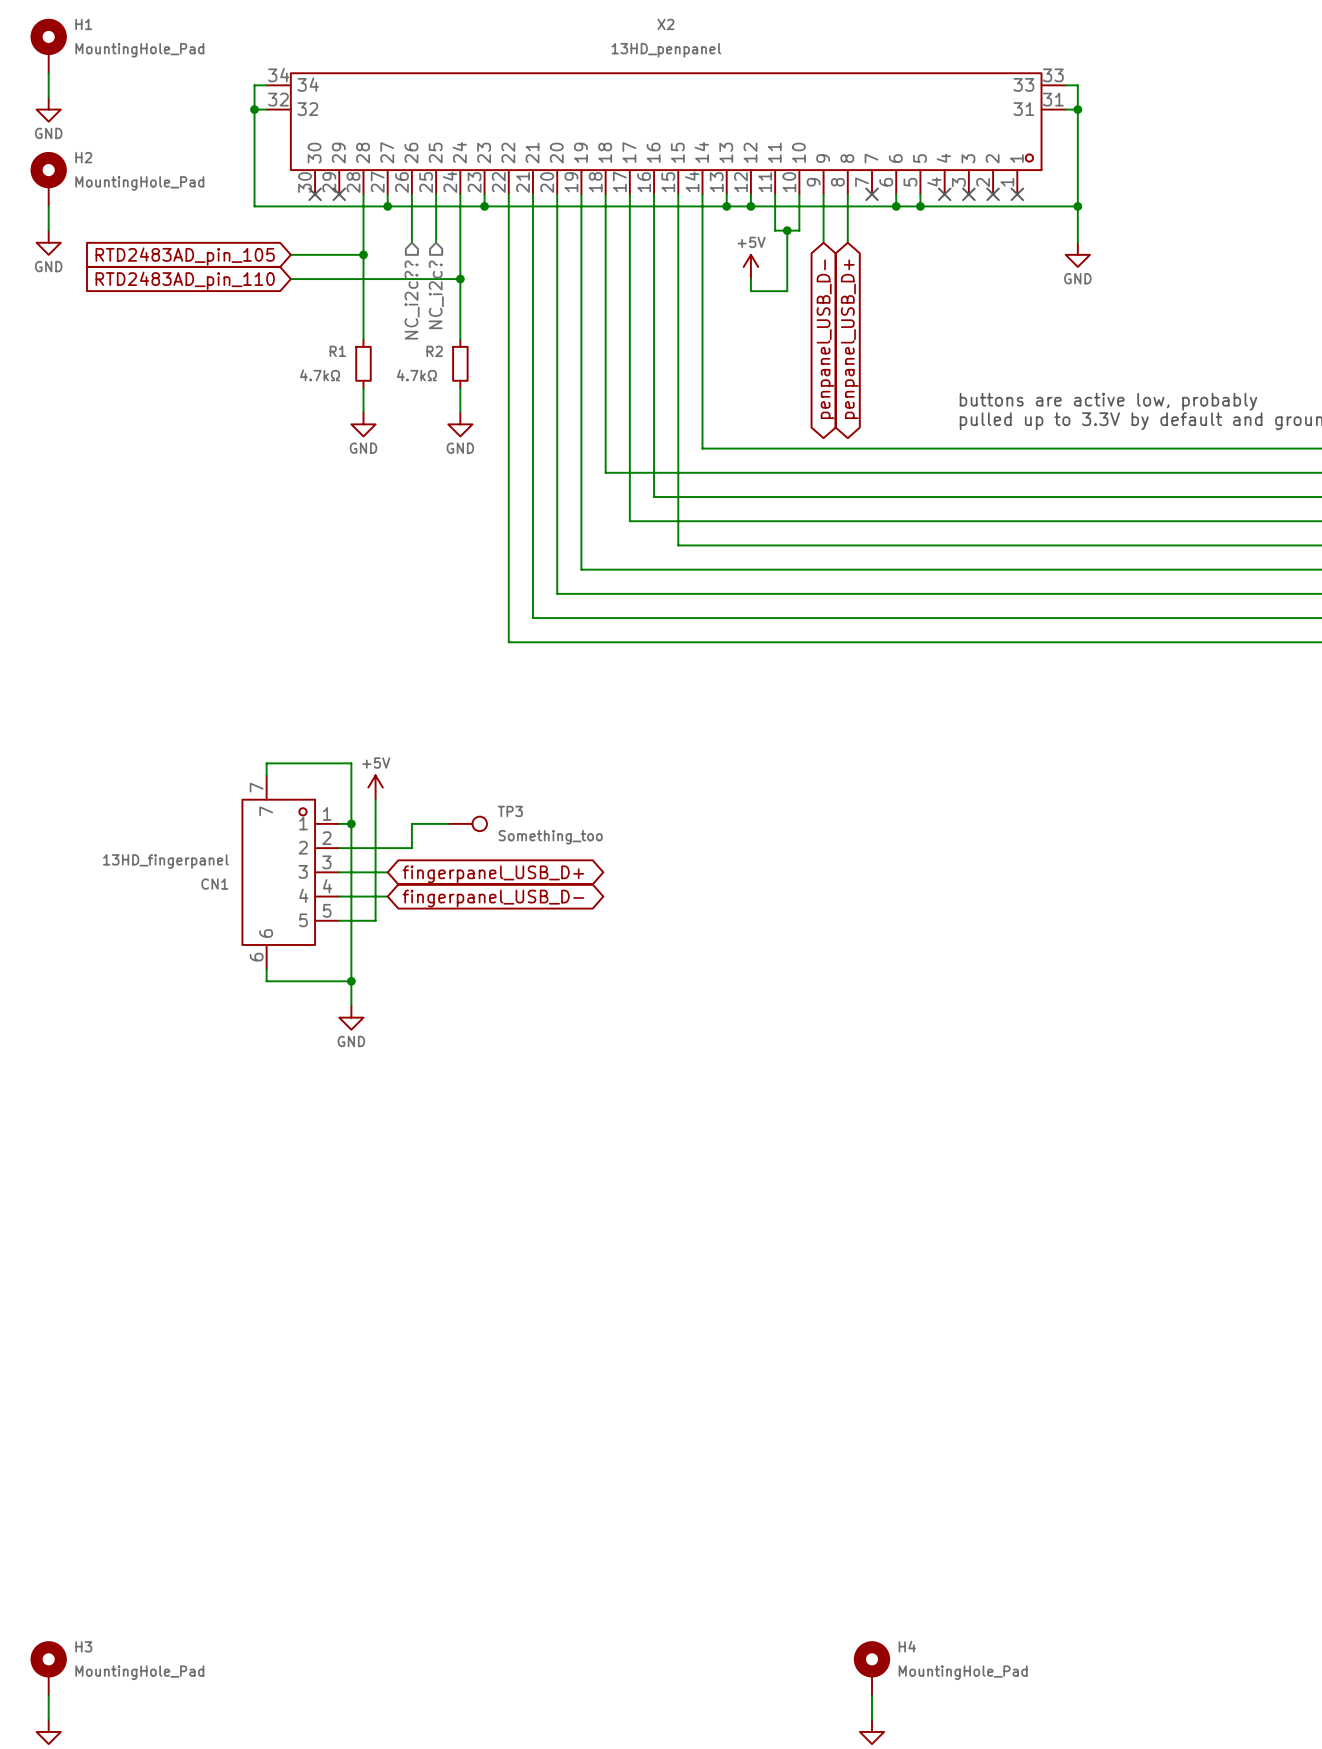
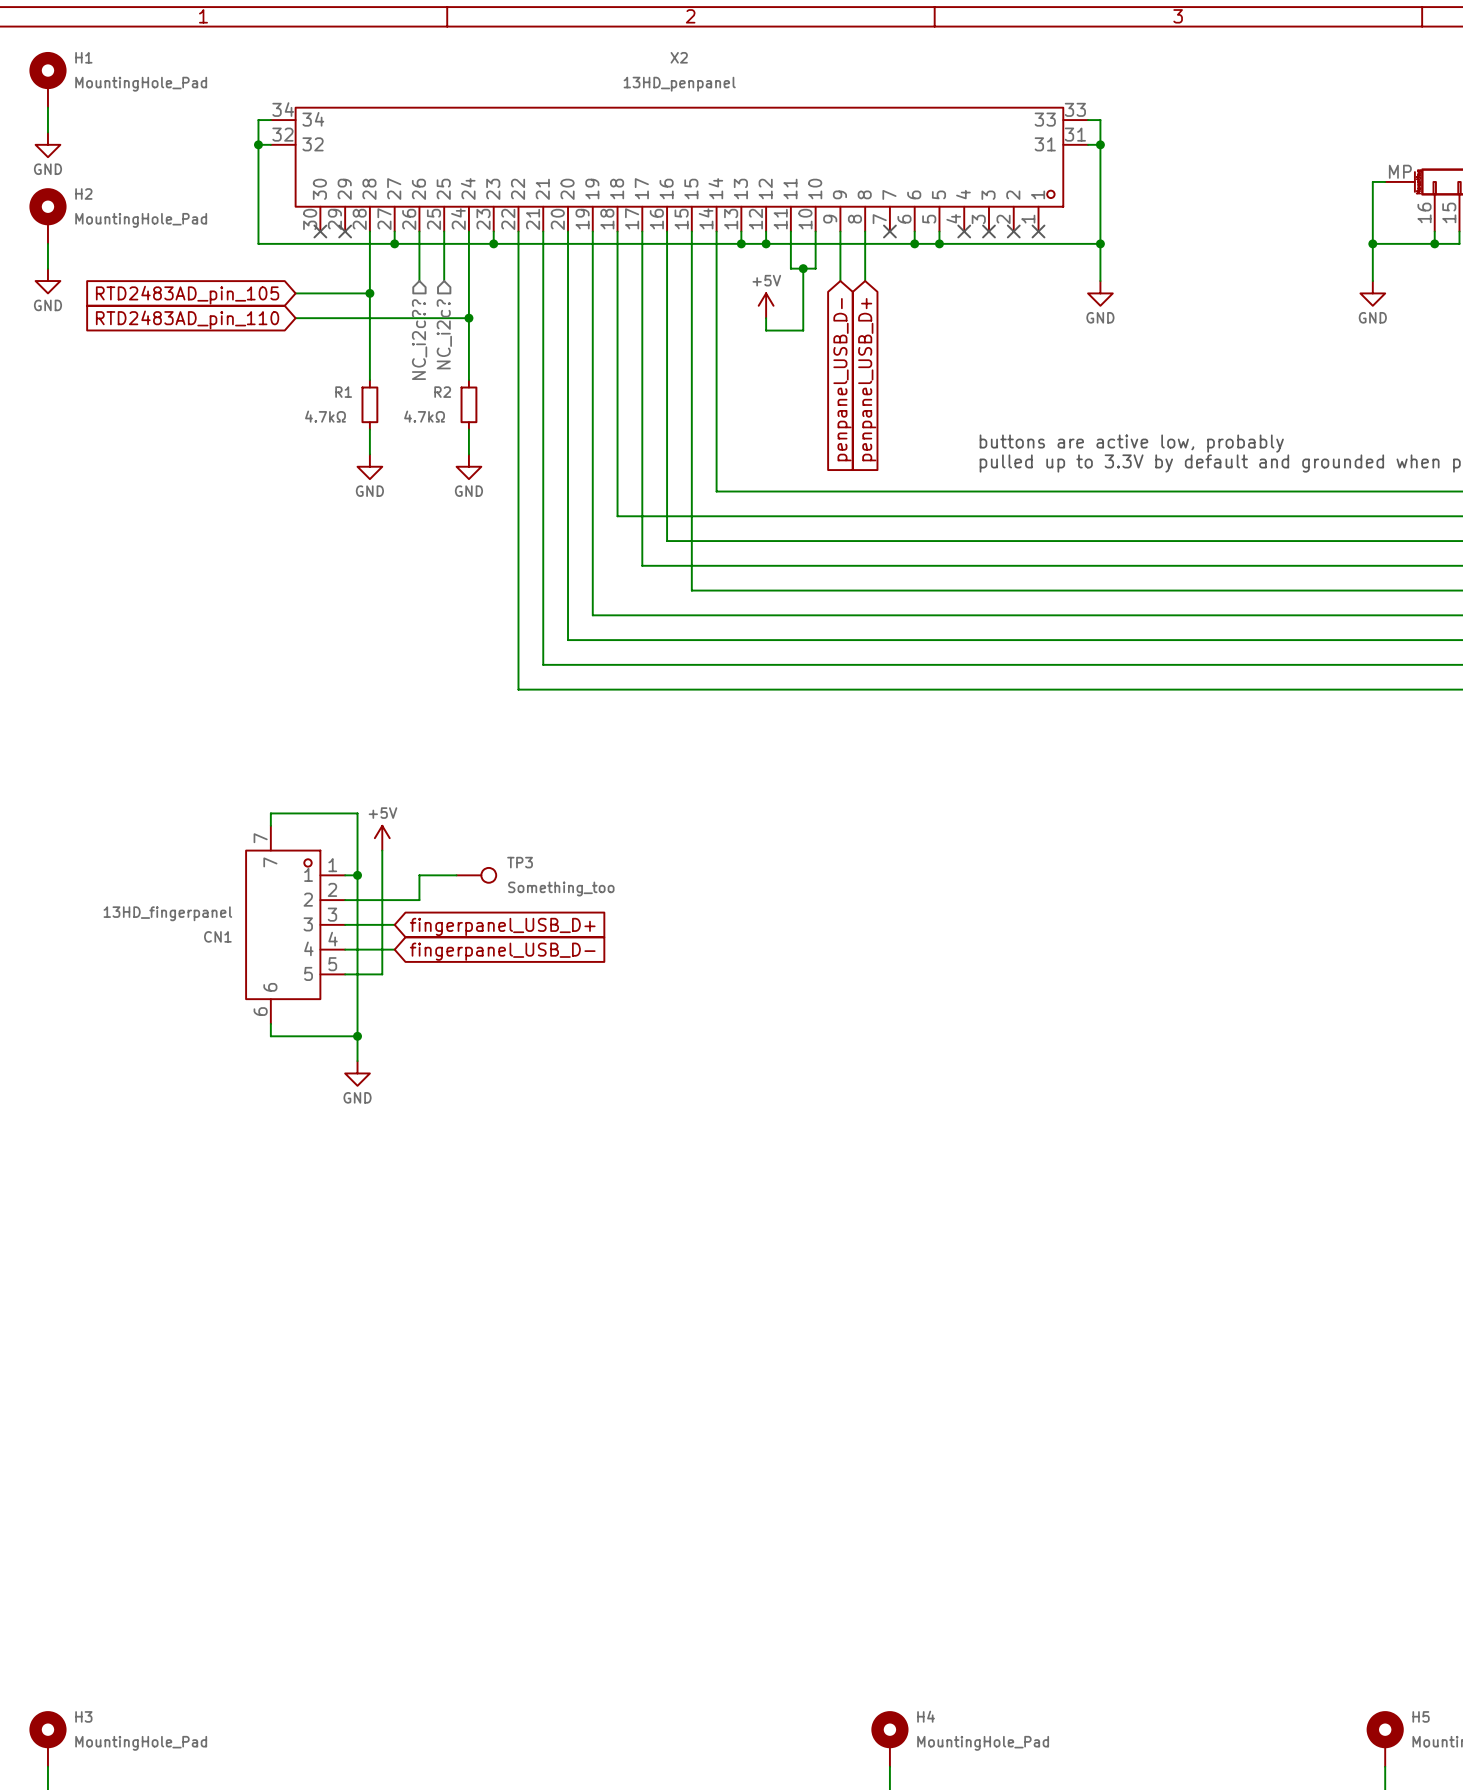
global label shape: bidirectional (825, 339) -> input (842, 379)
global label shape: bidirectional (849, 339) -> input (867, 379)
global label shape: bidirectional (493, 874) -> input (502, 926)
global label shape: bidirectional (493, 898) -> input (502, 951)

